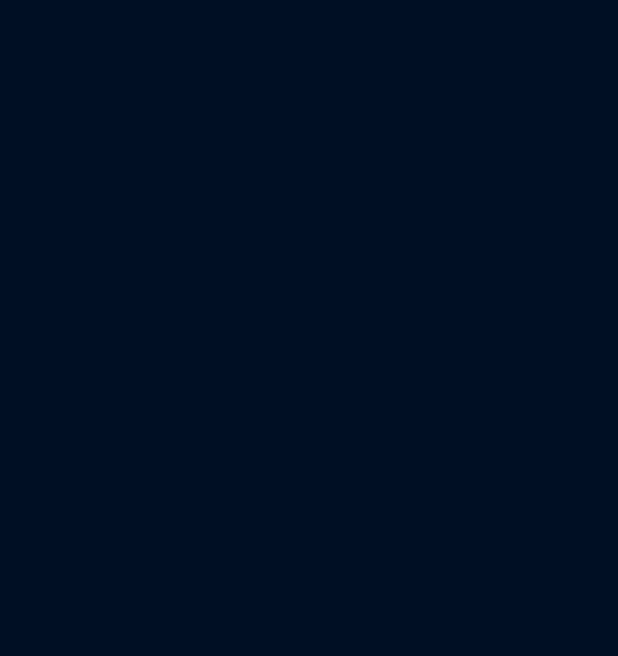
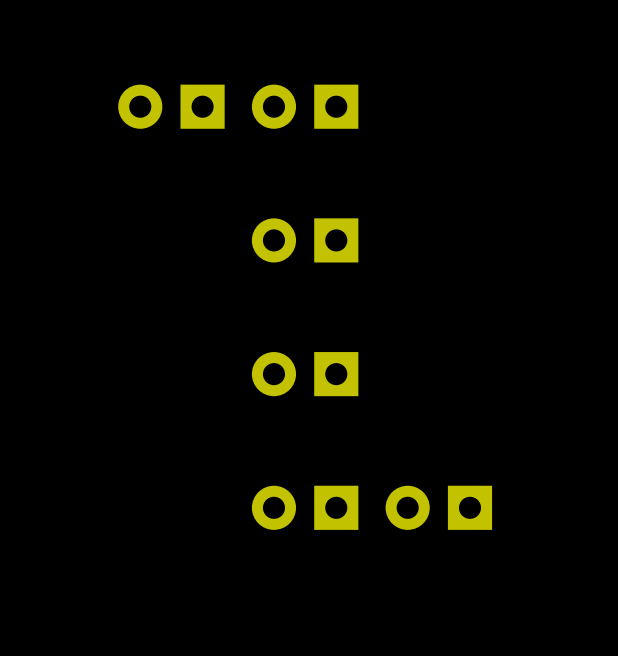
part: none -> (171, 106)
part: none -> (305, 106)
part: none -> (305, 240)
part: none -> (305, 374)
part: none -> (305, 507)
part: none -> (438, 507)

